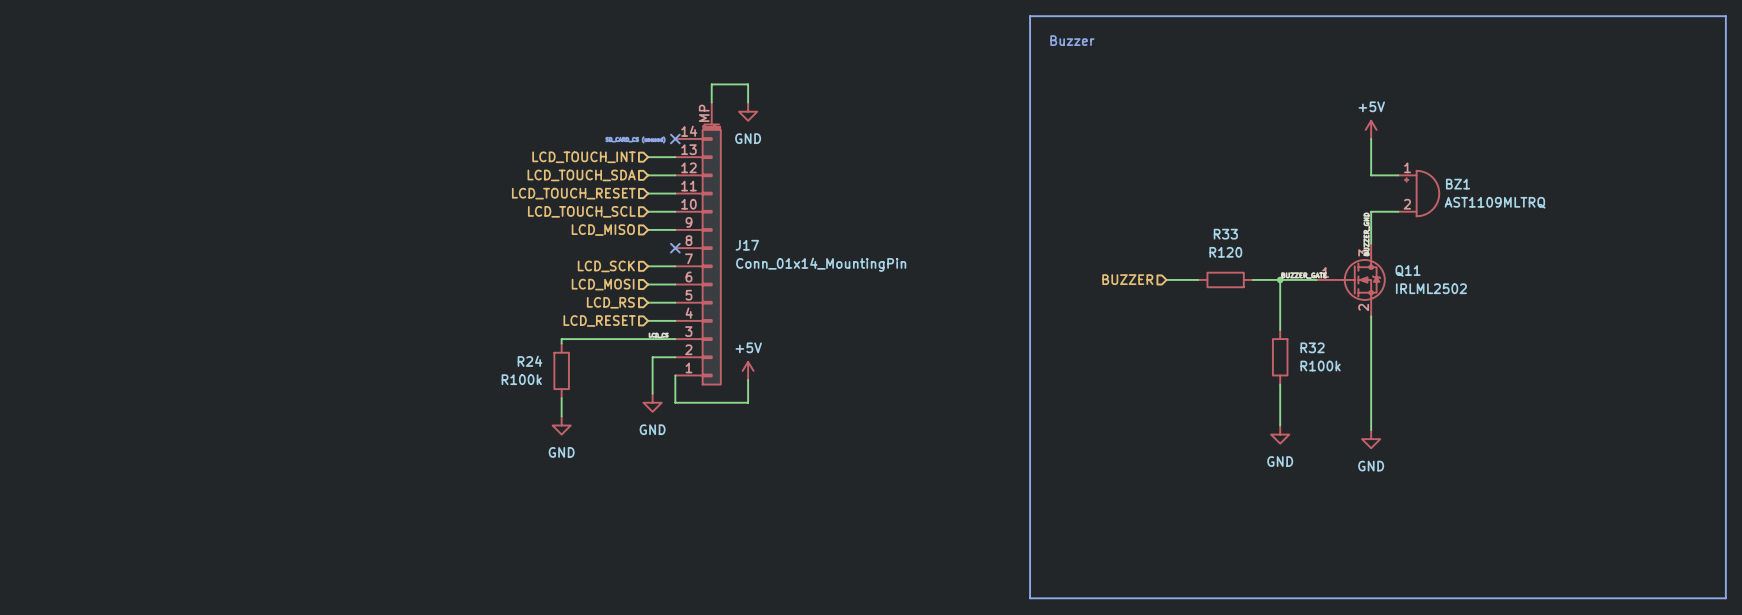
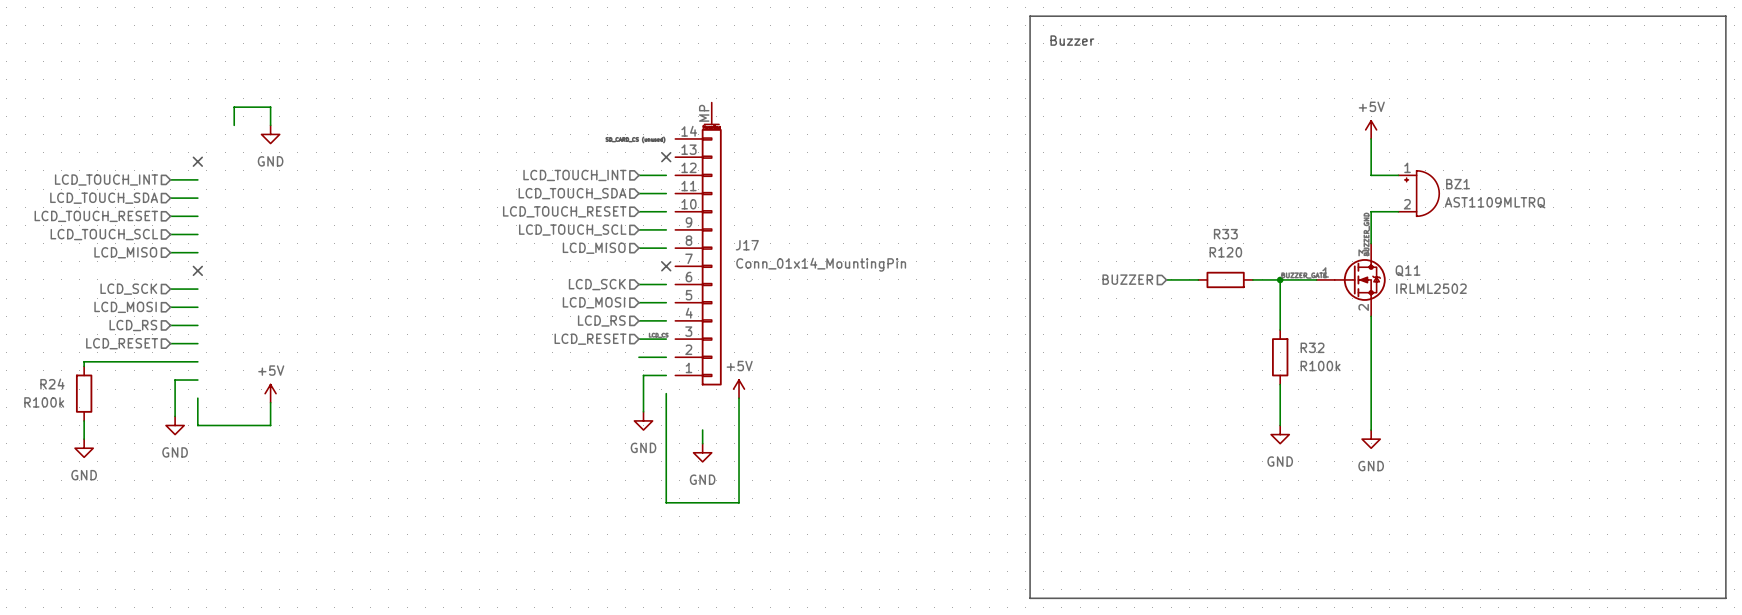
wire: (711, 102) (711, 84) (748, 84) (748, 102) -> none
power symbol: GND (748, 111) -> none
wire: none -> (234, 125) (234, 107) (270, 107) (270, 125)
power symbol: none -> GND (270, 134)
no-connect mark position: (675, 138) -> (666, 157)
hierarchical label position: LCD_TOUCH_INT (584, 157) -> LCD_TOUCH_INT (574, 175)
wire: (648, 157) (675, 157) -> none
no-connect mark: none -> (197, 161)
hierarchical label position: LCD_TOUCH_SDA (581, 175) -> LCD_TOUCH_SDA (572, 193)
wire: (666, 175) (675, 175) -> (638, 175) (648, 175)
wire: none -> (170, 179) (197, 179)
hierarchical label: none -> LCD_TOUCH_INT (106, 180)
hierarchical label position: LCD_TOUCH_RESET (573, 193) -> LCD_TOUCH_RESET (564, 211)
wire: (666, 193) (675, 193) -> (638, 193) (648, 193)
hierarchical label: none -> LCD_TOUCH_SDA (104, 198)
wire: none -> (170, 198) (197, 198)
hierarchical label position: LCD_TOUCH_SCL (581, 211) -> LCD_TOUCH_SCL (572, 230)
wire: (666, 211) (675, 211) -> (638, 211) (648, 211)
hierarchical label: none -> LCD_TOUCH_RESET (96, 216)
wire: none -> (170, 216) (197, 216)
wire: (666, 229) (675, 229) -> (638, 229) (648, 229)
hierarchical label position: LCD_MISO (603, 230) -> LCD_MISO (594, 248)
hierarchical label: none -> LCD_TOUCH_SCL (104, 234)
wire: none -> (170, 234) (197, 234)
no-connect mark position: (675, 248) -> (666, 266)
hierarchical label: none -> LCD_MISO (125, 252)
wire: none -> (170, 252) (197, 252)
hierarchical label position: LCD_SCK (606, 266) -> LCD_SCK (597, 284)
wire: (648, 266) (675, 266) -> (638, 248) (666, 248)
no-connect mark: none -> (197, 270)
hierarchical label position: LCD_MOSI (603, 284) -> LCD_MOSI (593, 302)
wire: (666, 284) (675, 284) -> (638, 284) (648, 284)
hierarchical label: none -> LCD_SCK (128, 289)
wire: none -> (170, 289) (197, 289)
hierarchical label position: LCD_RS (610, 302) -> LCD_RS (601, 320)
wire: (666, 302) (675, 302) -> (638, 302) (648, 302)
hierarchical label: none -> LCD_MOSI (125, 307)
wire: none -> (170, 307) (197, 307)
hierarchical label position: LCD_RESET (599, 320) -> LCD_RESET (590, 339)
wire: (666, 320) (675, 320) -> (638, 320) (648, 320)
hierarchical label: none -> LCD_RS (133, 325)
wire: none -> (170, 325) (197, 325)
wire: (638, 339) (561, 339) (561, 343) -> none
wire: (666, 339) (675, 339) -> none
hierarchical label: none -> LCD_RESET (122, 343)
wire: none -> (170, 343) (197, 343)
wire: (652, 357) (652, 393) -> (652, 357) (638, 357)
wire: (666, 357) (675, 357) -> none
wire: none -> (197, 361) (84, 361) (84, 366)
R24 position: (561, 370) -> (84, 393)
power symbol position: +5V (748, 370) -> +5V (739, 389)
wire: none -> (666, 375) (643, 375) (643, 411)
wire: (675, 375) (675, 402) (748, 402) (748, 380) -> none
wire: none -> (197, 380) (175, 380) (175, 416)
power symbol: none -> +5V (270, 393)
wire: none -> (666, 393) (666, 502) (739, 502) (739, 398)
wire: none -> (197, 398) (197, 425) (270, 425) (270, 402)
wire: (561, 398) (561, 416) -> none
power symbol position: GND (652, 402) -> GND (643, 420)
wire: none -> (84, 420) (84, 439)
power symbol: none -> GND (175, 425)
power symbol: GND (561, 425) -> none
wire: none -> (702, 430) (702, 443)
power symbol: none -> GND (84, 448)
power symbol: none -> GND (702, 452)

